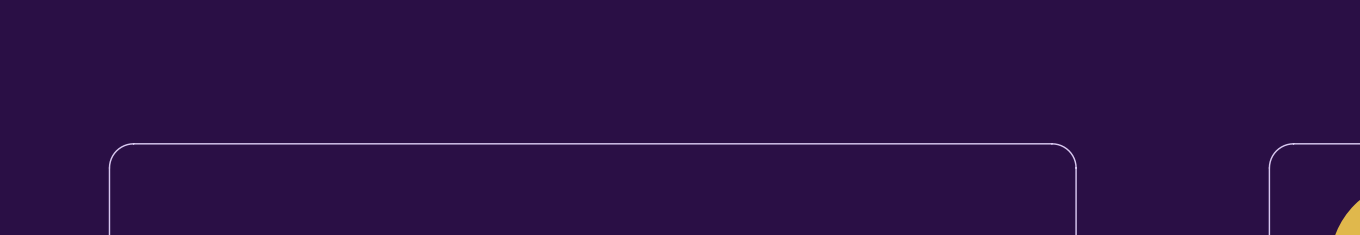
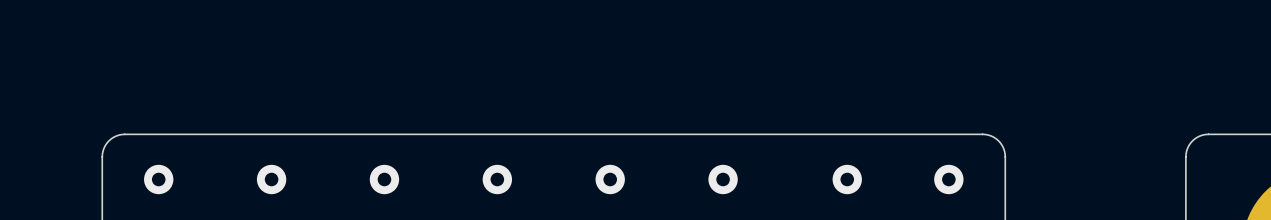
via: none -> (158, 179)
via: none -> (271, 179)
via: none -> (384, 179)
via: none -> (497, 179)
via: none -> (610, 179)
via: none -> (723, 179)
via: none -> (847, 179)
via: none -> (948, 179)

